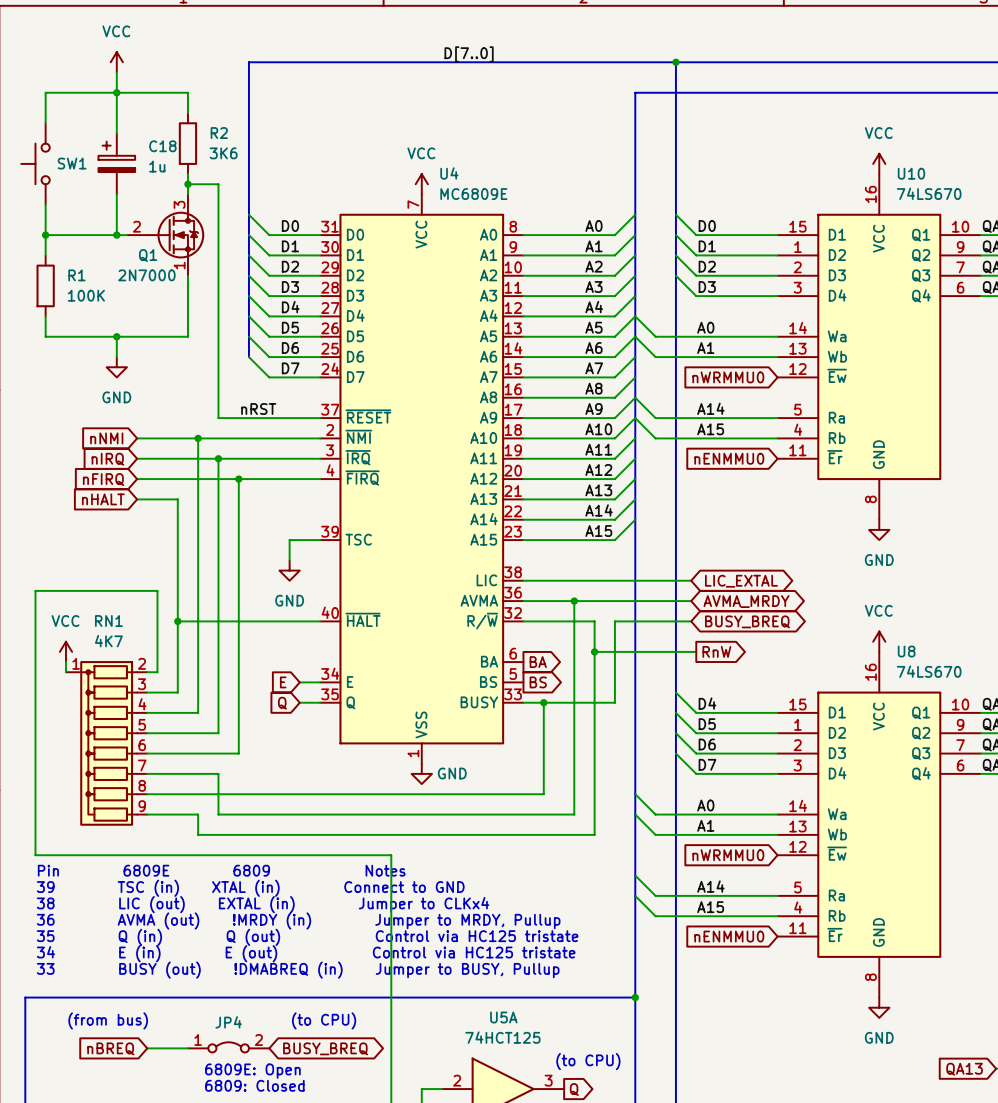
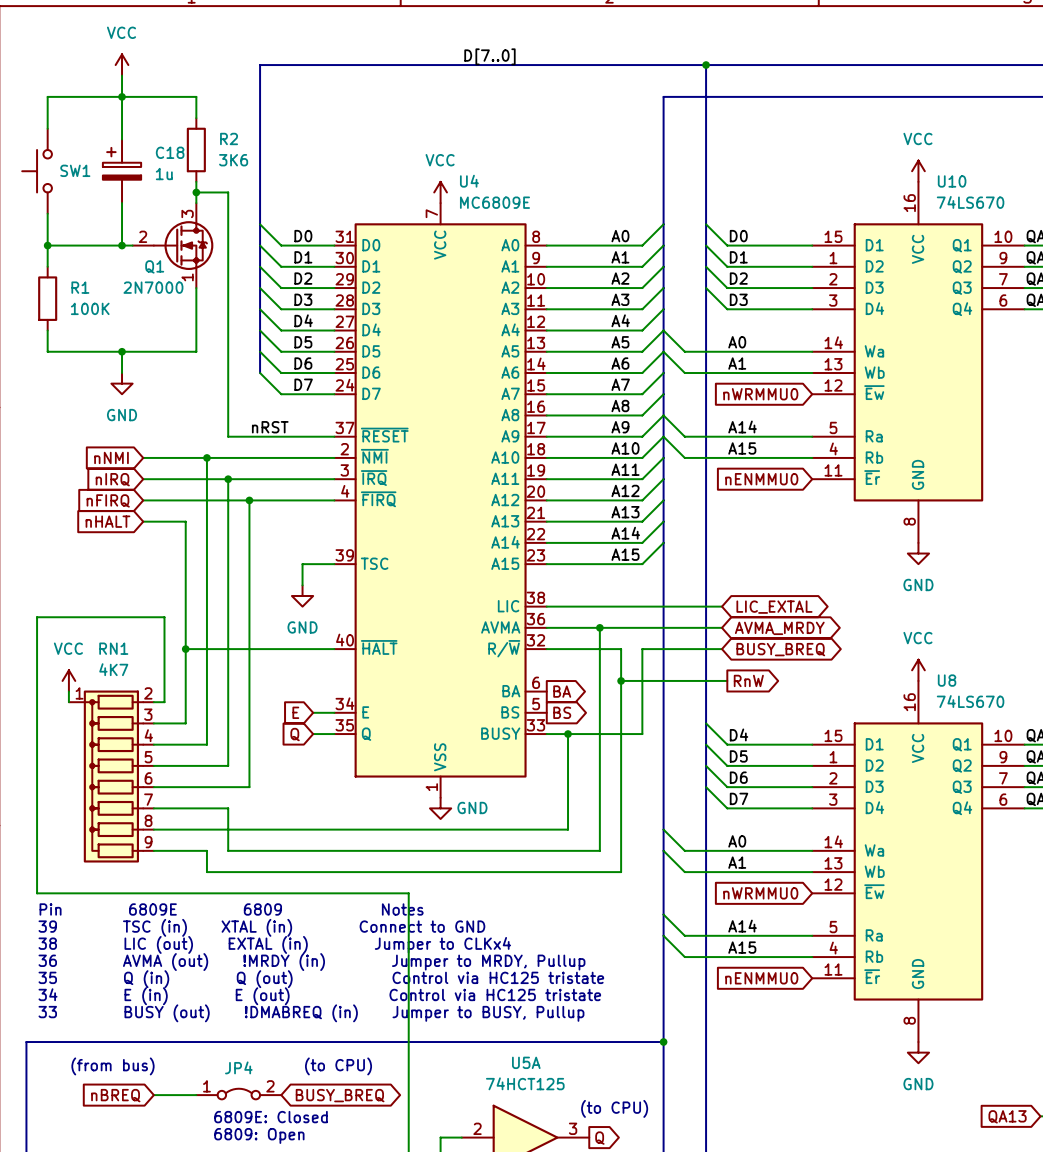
text: 6809E: Open (252, 1071) -> 6809E: Closed (271, 1117)
text: 6809: Closed (254, 1085) -> 6809: Open (259, 1135)

